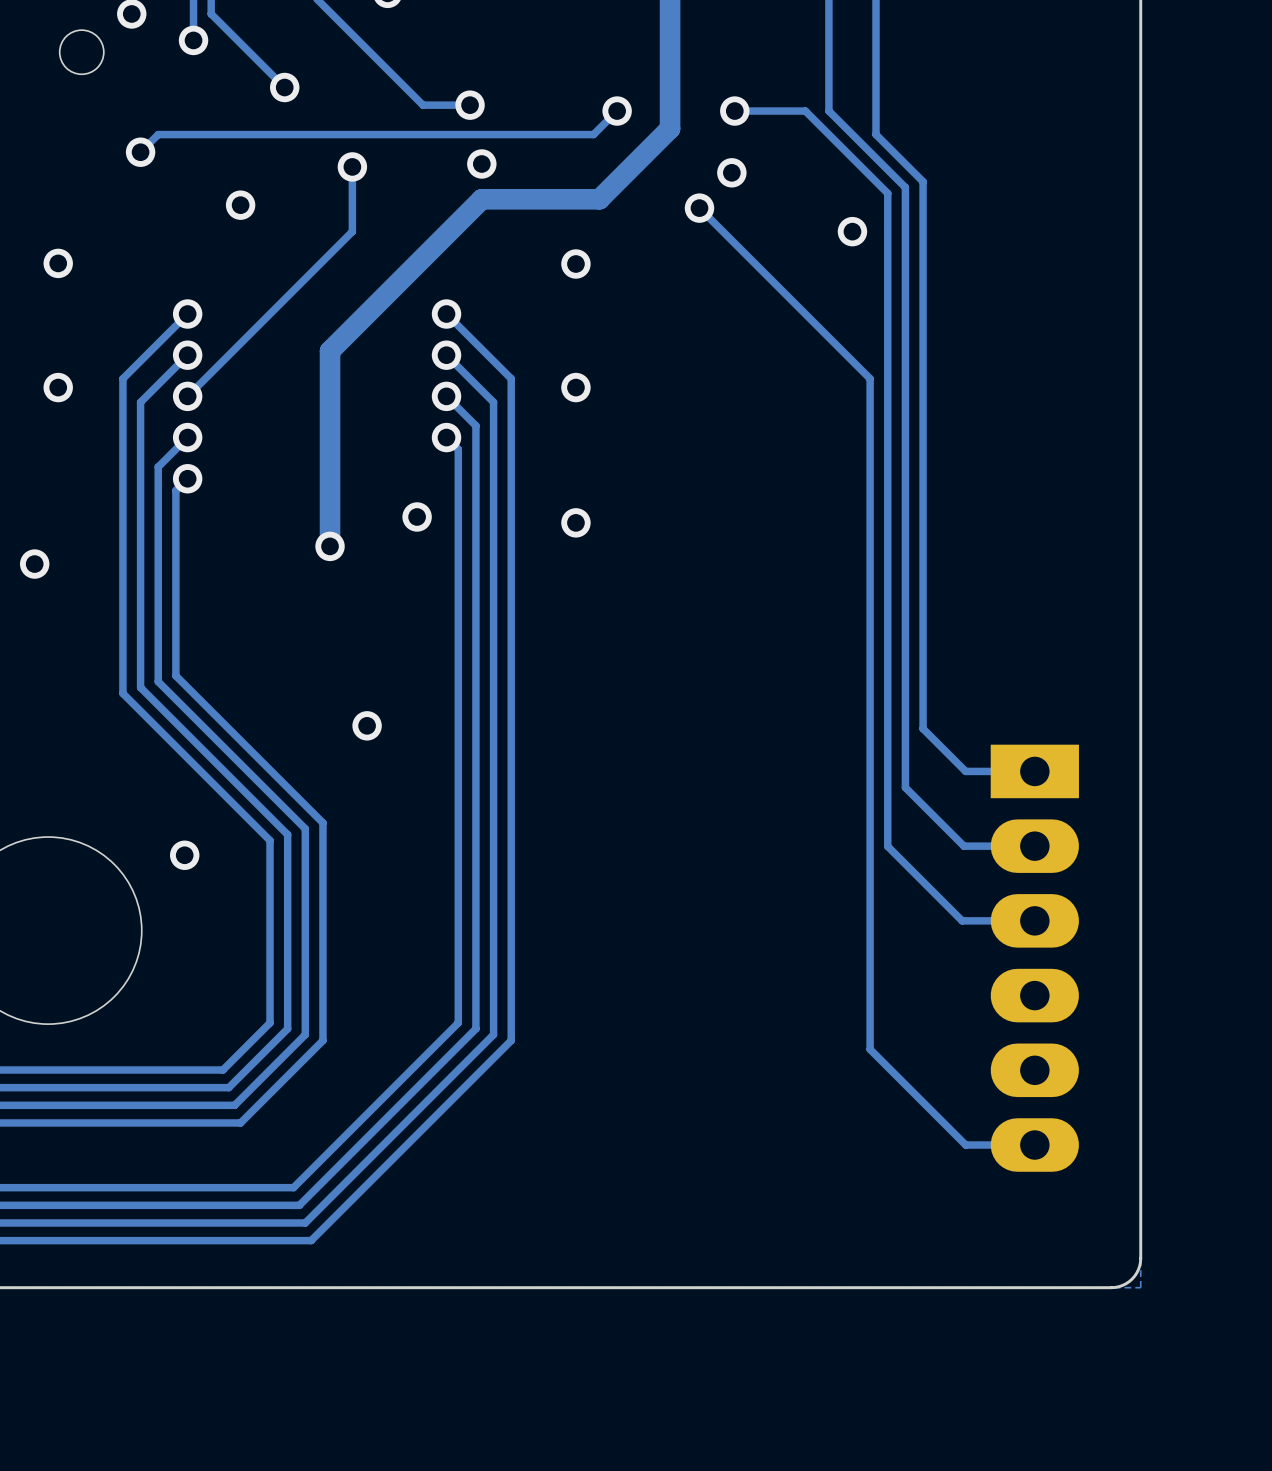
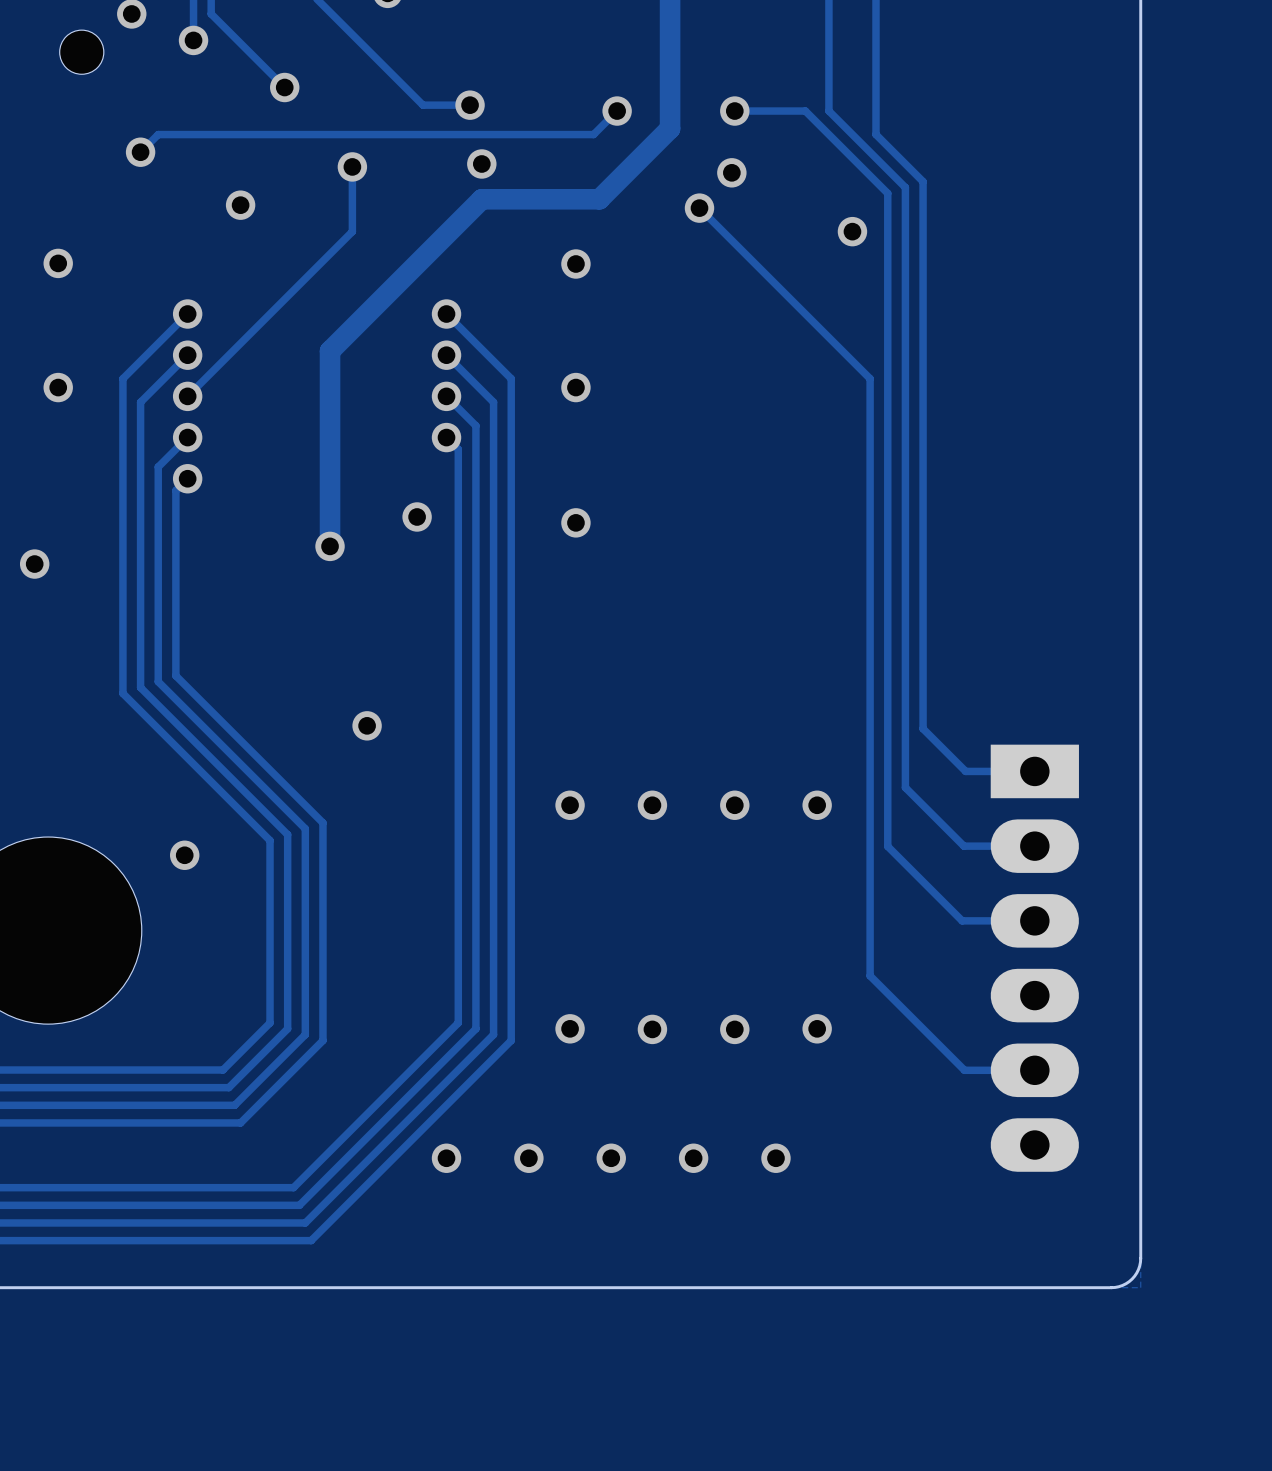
via: none -> (570, 805)
via: none -> (652, 805)
via: none -> (734, 805)
via: none -> (817, 805)
track: (870, 975) (870, 1049) (965, 1145) (1034, 1145) -> (870, 975) (964, 1070) (1034, 1070)
via: none -> (570, 1028)
via: none -> (817, 1028)
via: none -> (652, 1029)
via: none -> (734, 1029)
via: none -> (446, 1158)
via: none -> (528, 1158)
via: none -> (611, 1158)
via: none -> (693, 1158)
via: none -> (775, 1158)

